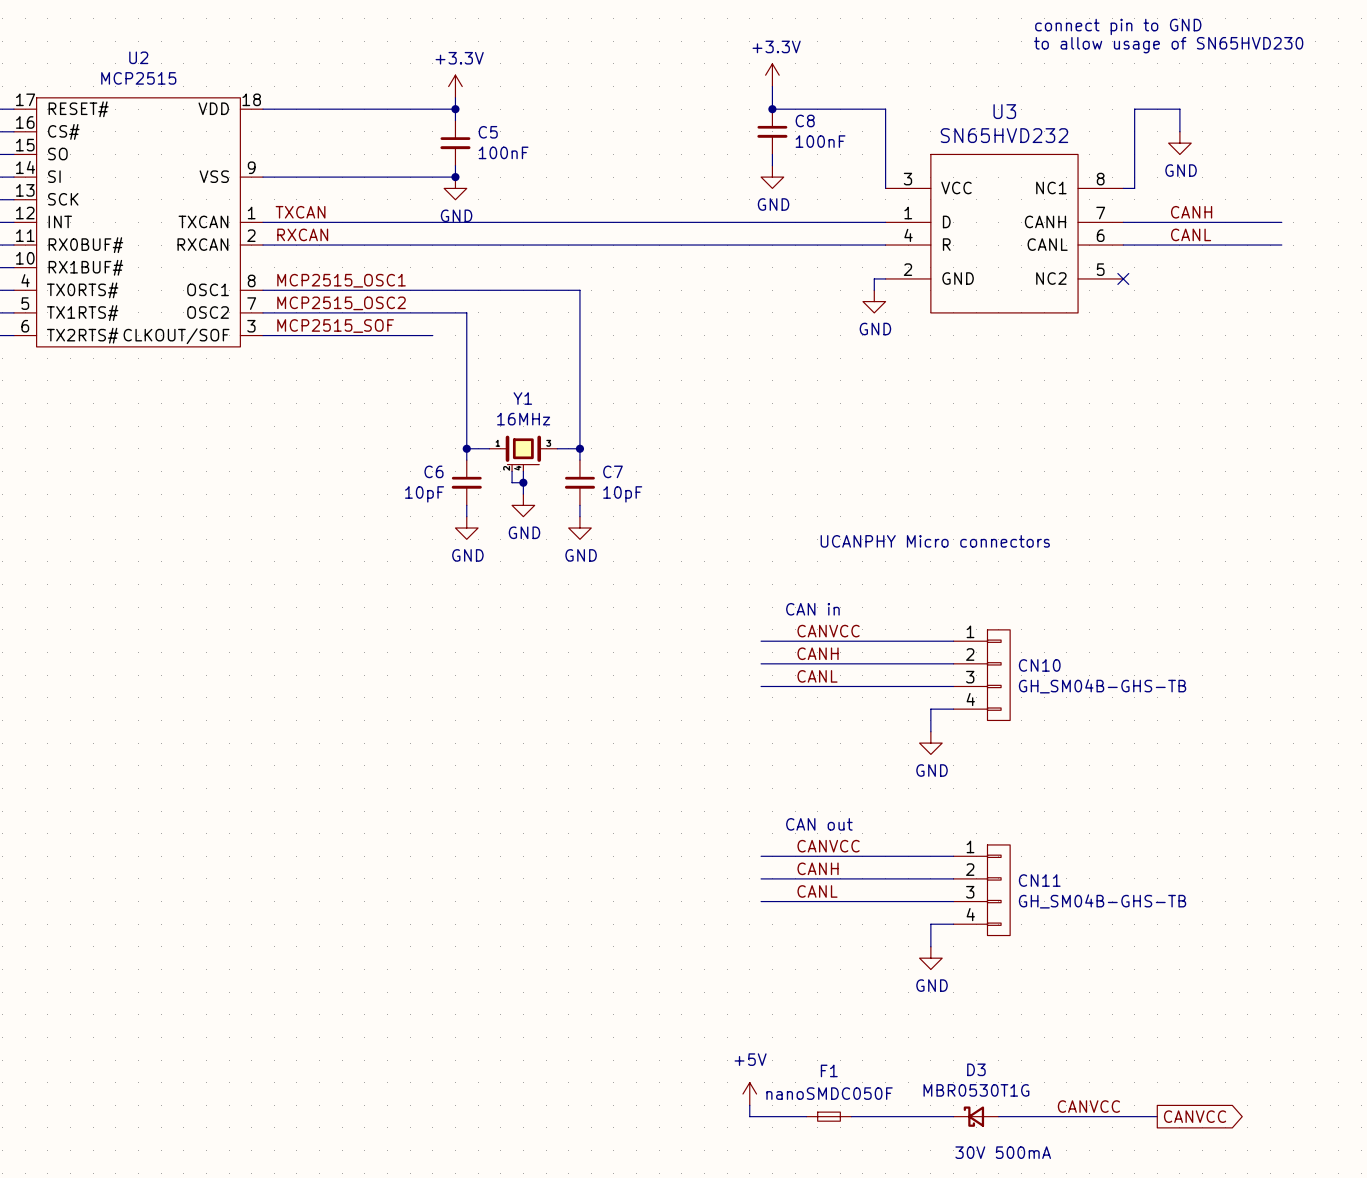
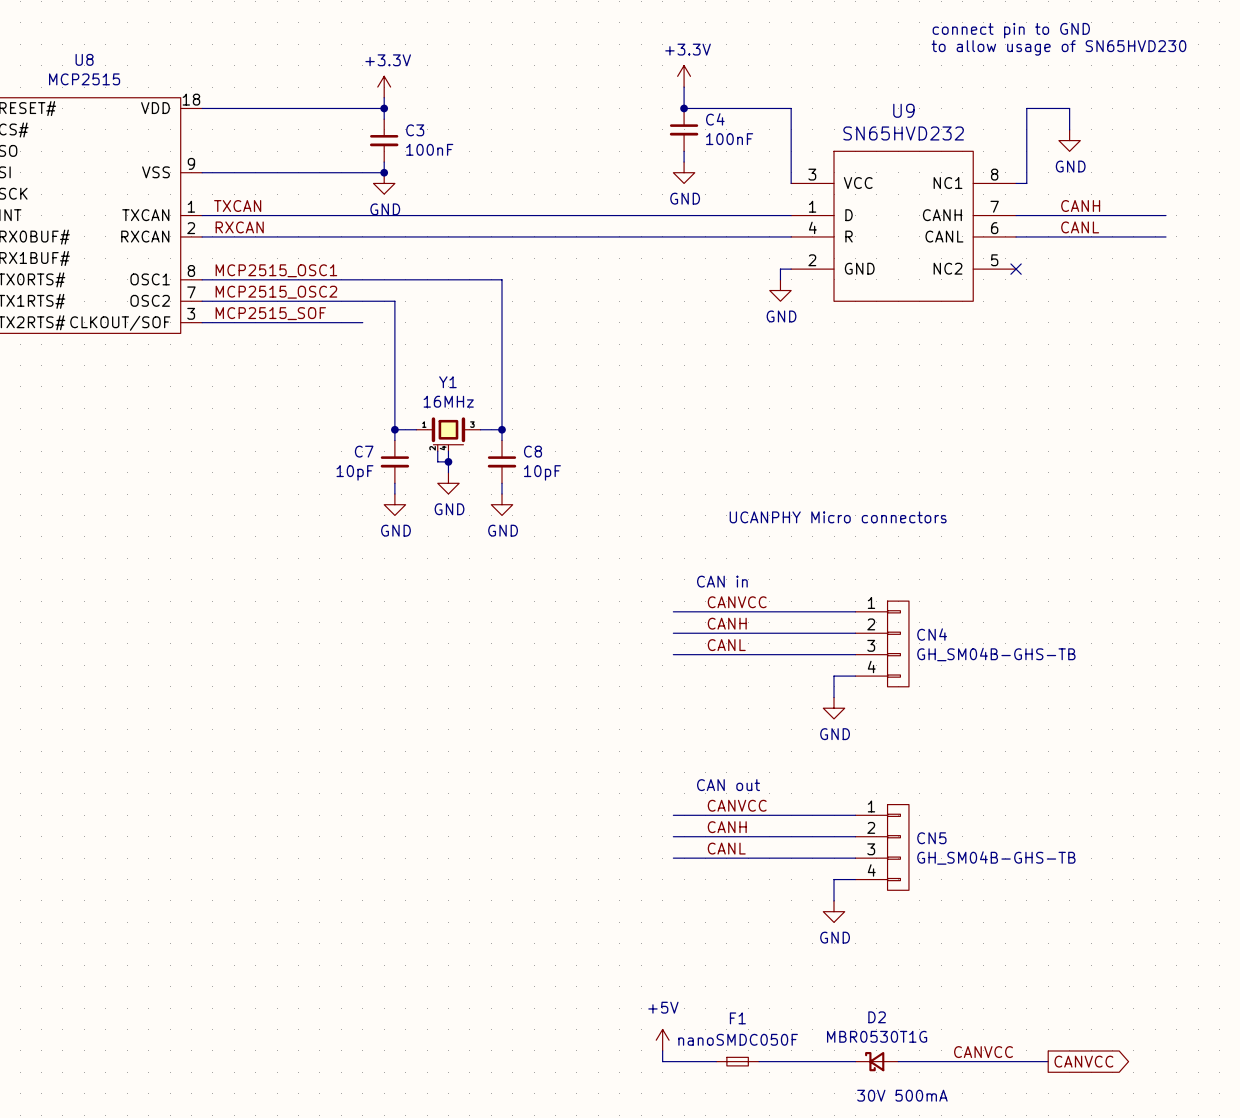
U2 name: U2 (138, 57) -> U8 (84, 59)
U3 name: U3 (1004, 111) -> U9 (903, 110)
C8 name: C8 (805, 120) -> C4 (715, 119)
C5 name: C5 (488, 132) -> C3 (415, 130)
C6 name: C6 (433, 471) -> C7 (364, 451)
C7 name: C7 (613, 471) -> C8 (533, 451)
CN10 name: CN10 (1039, 665) -> CN4 (932, 634)
CN11 name: CN11 (1039, 880) -> CN5 (931, 838)
D3 name: D3 (976, 1069) -> D2 (877, 1017)

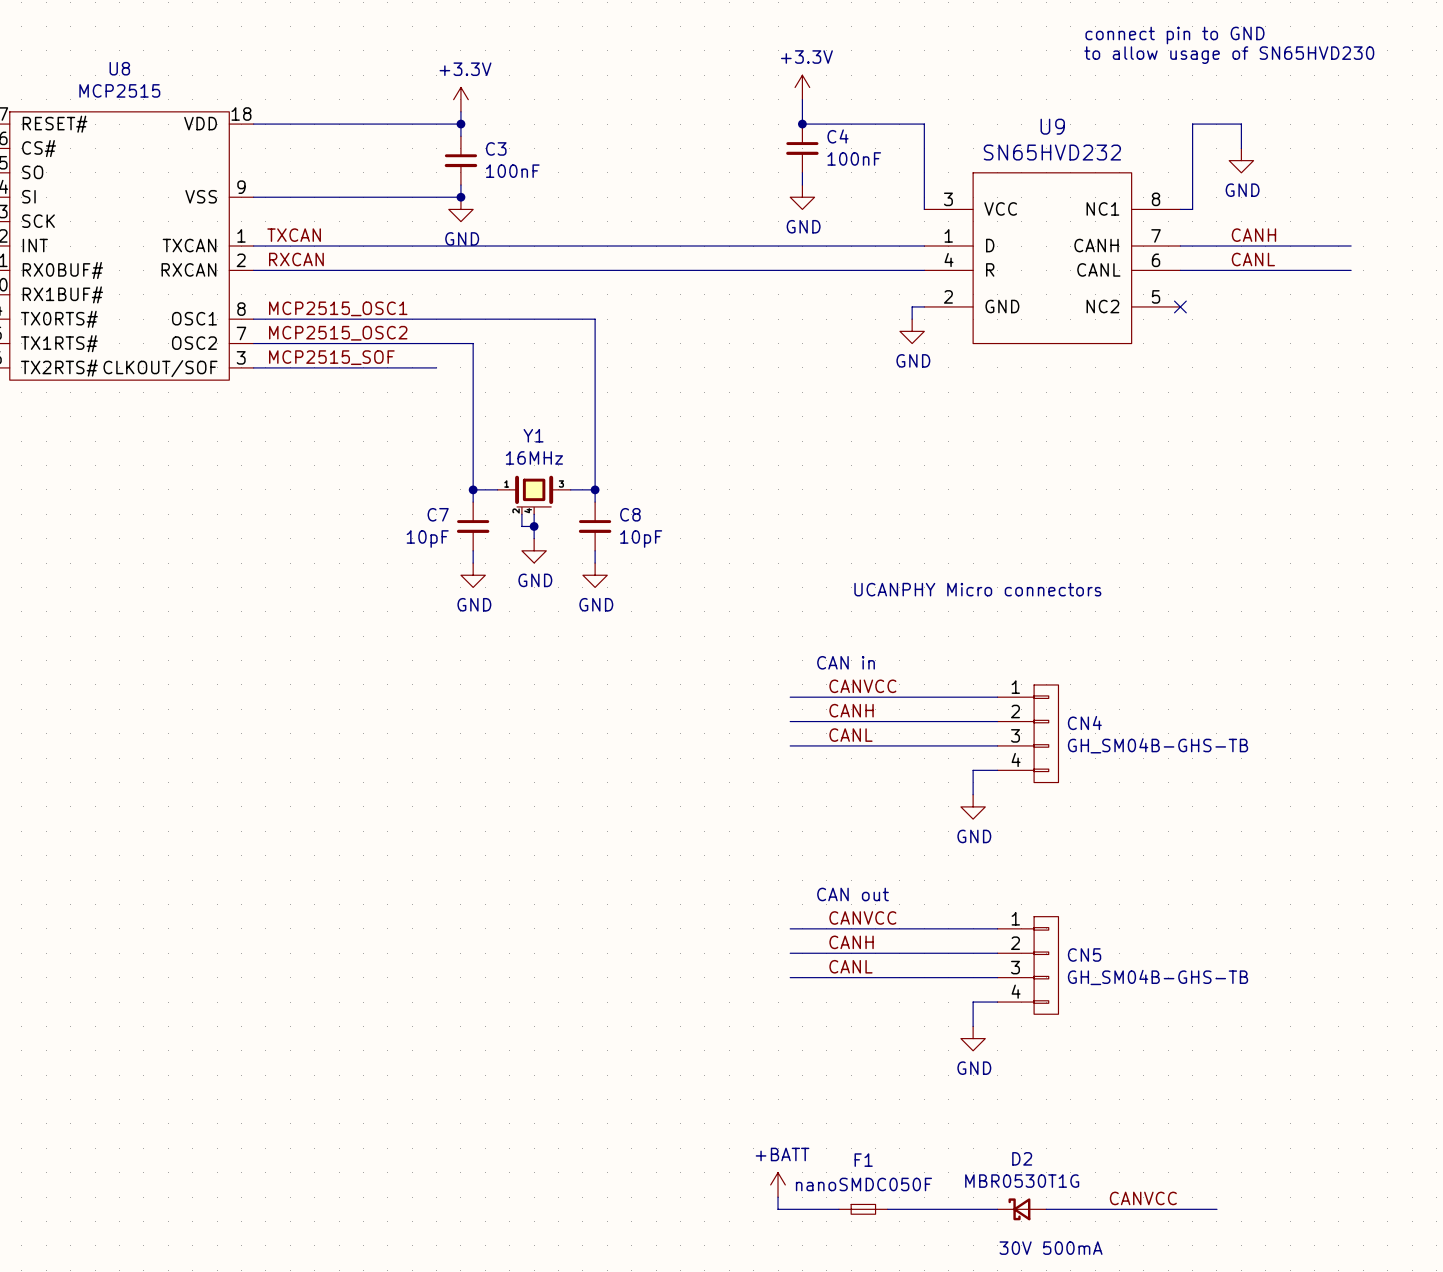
power symbol: +5V (662, 1040) -> +BATT (778, 1184)
global label: CANVCC (1083, 1061) -> none

